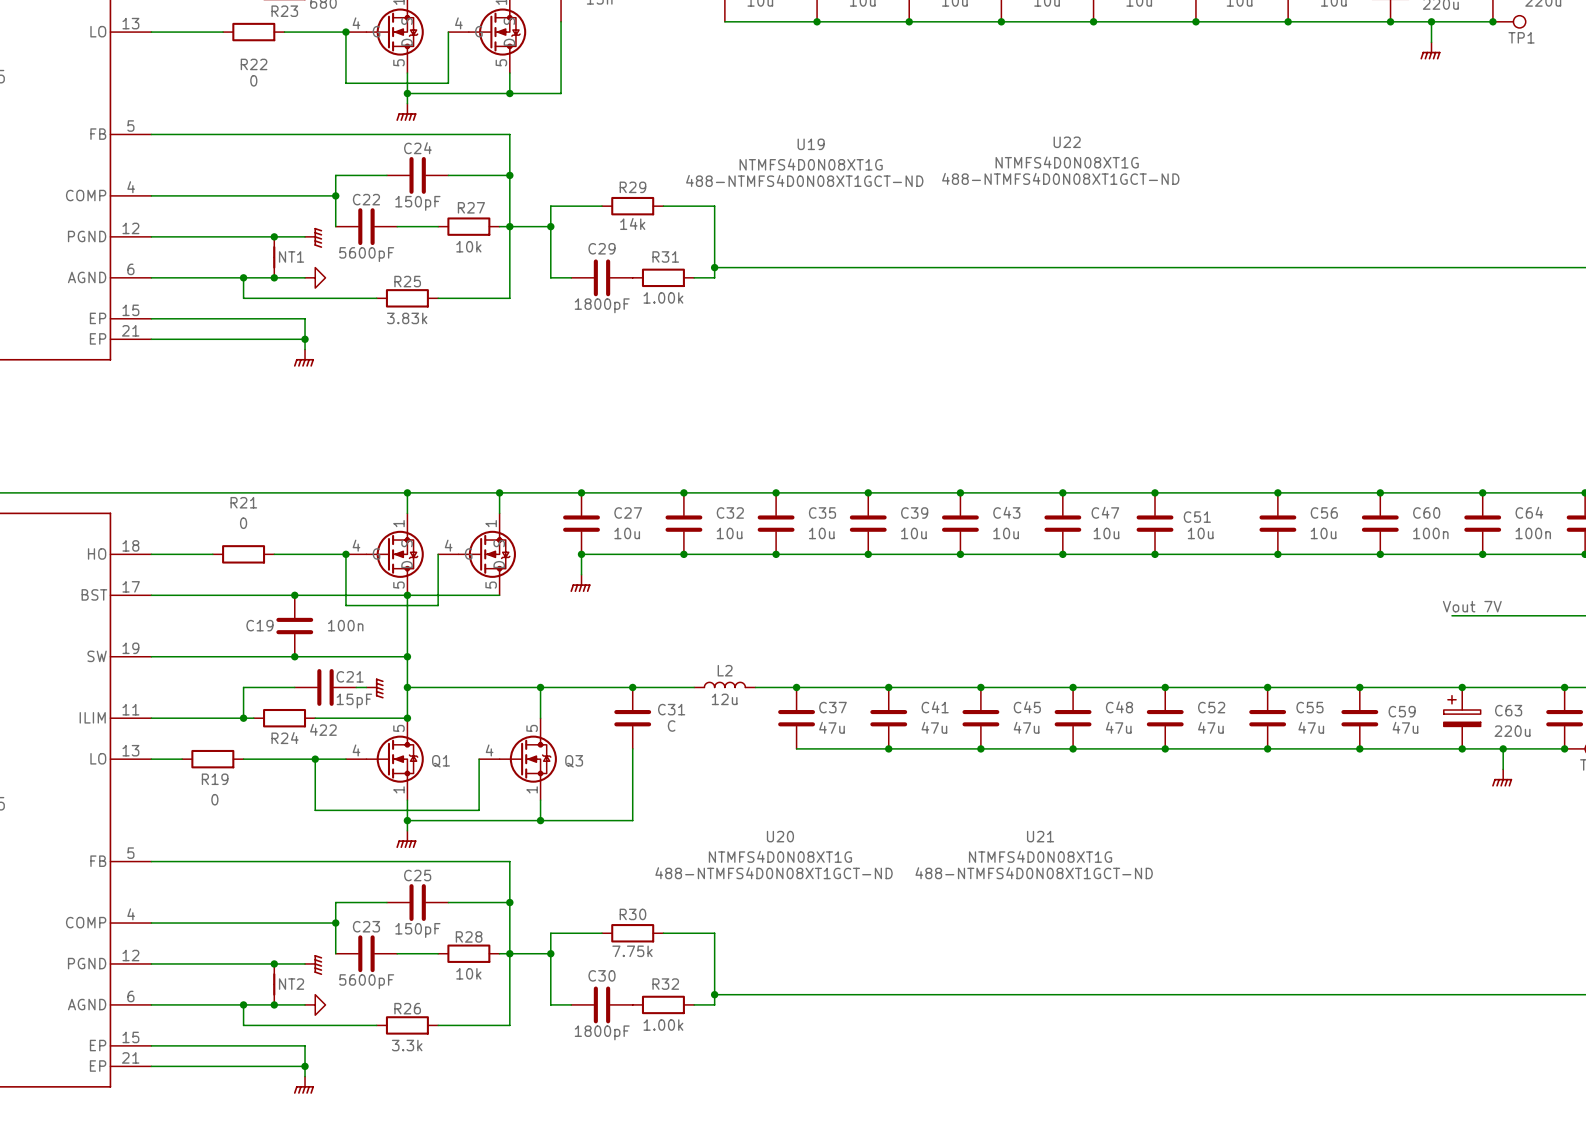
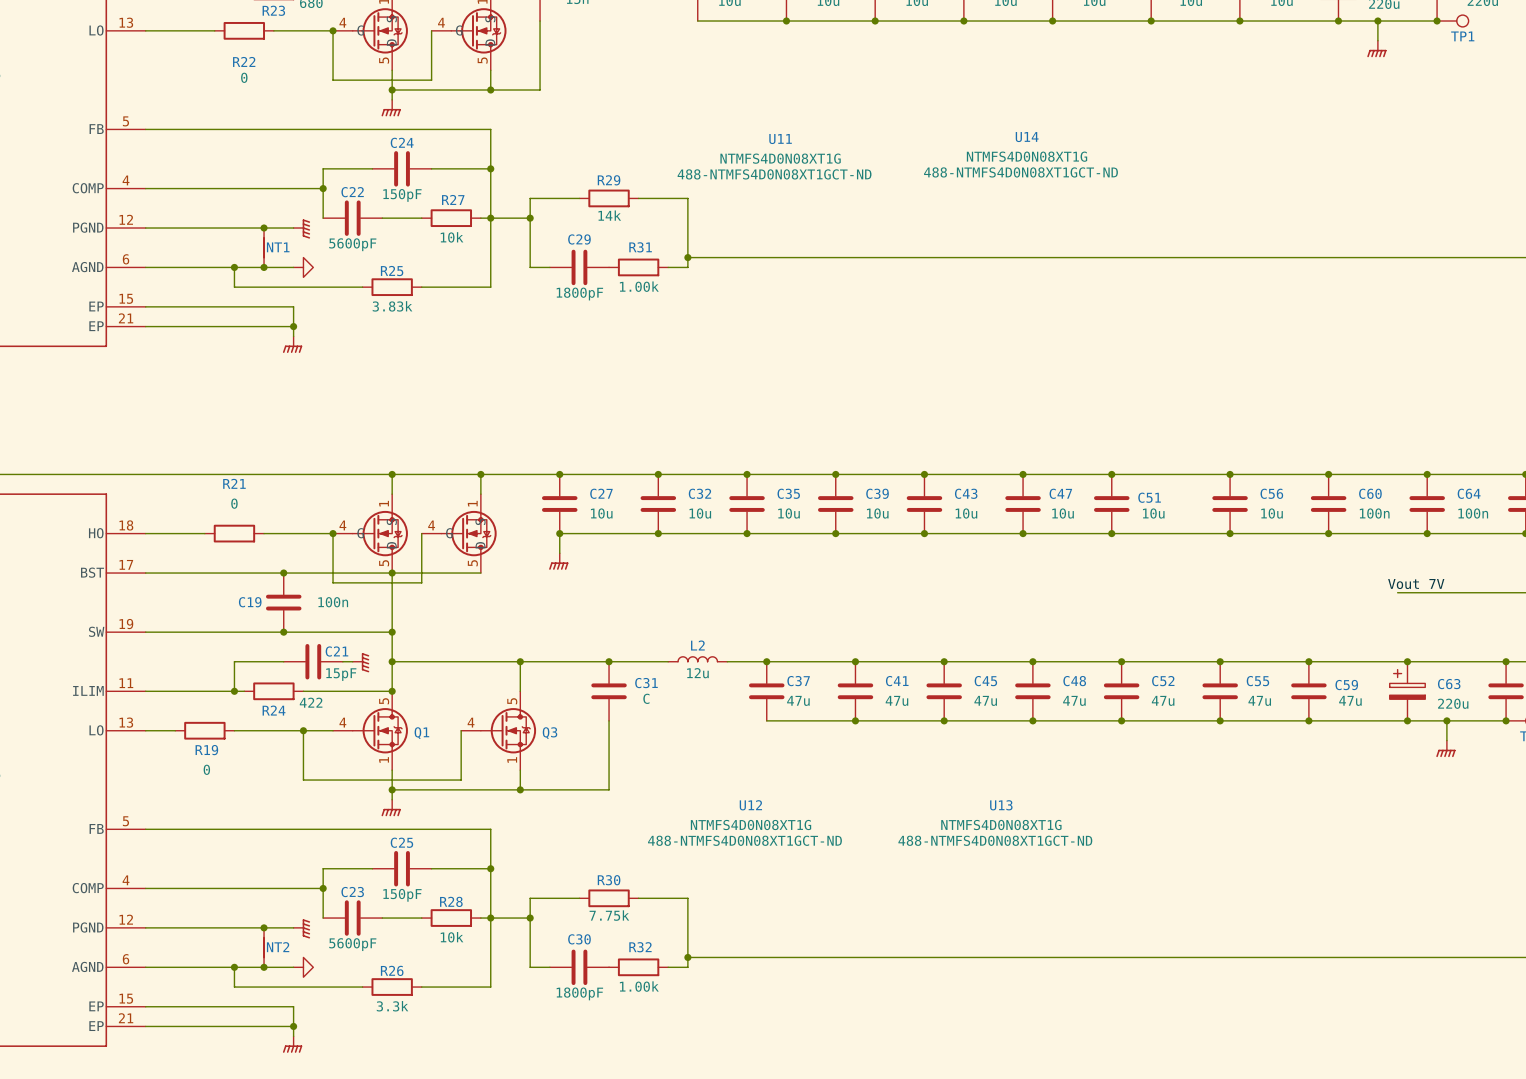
U22 name: U22 (1067, 142) -> U14 (1027, 137)
U19 name: U19 (811, 144) -> U11 (780, 139)
U20 name: U20 (780, 836) -> U12 (750, 805)
U21 name: U21 (1040, 836) -> U13 (1001, 805)

